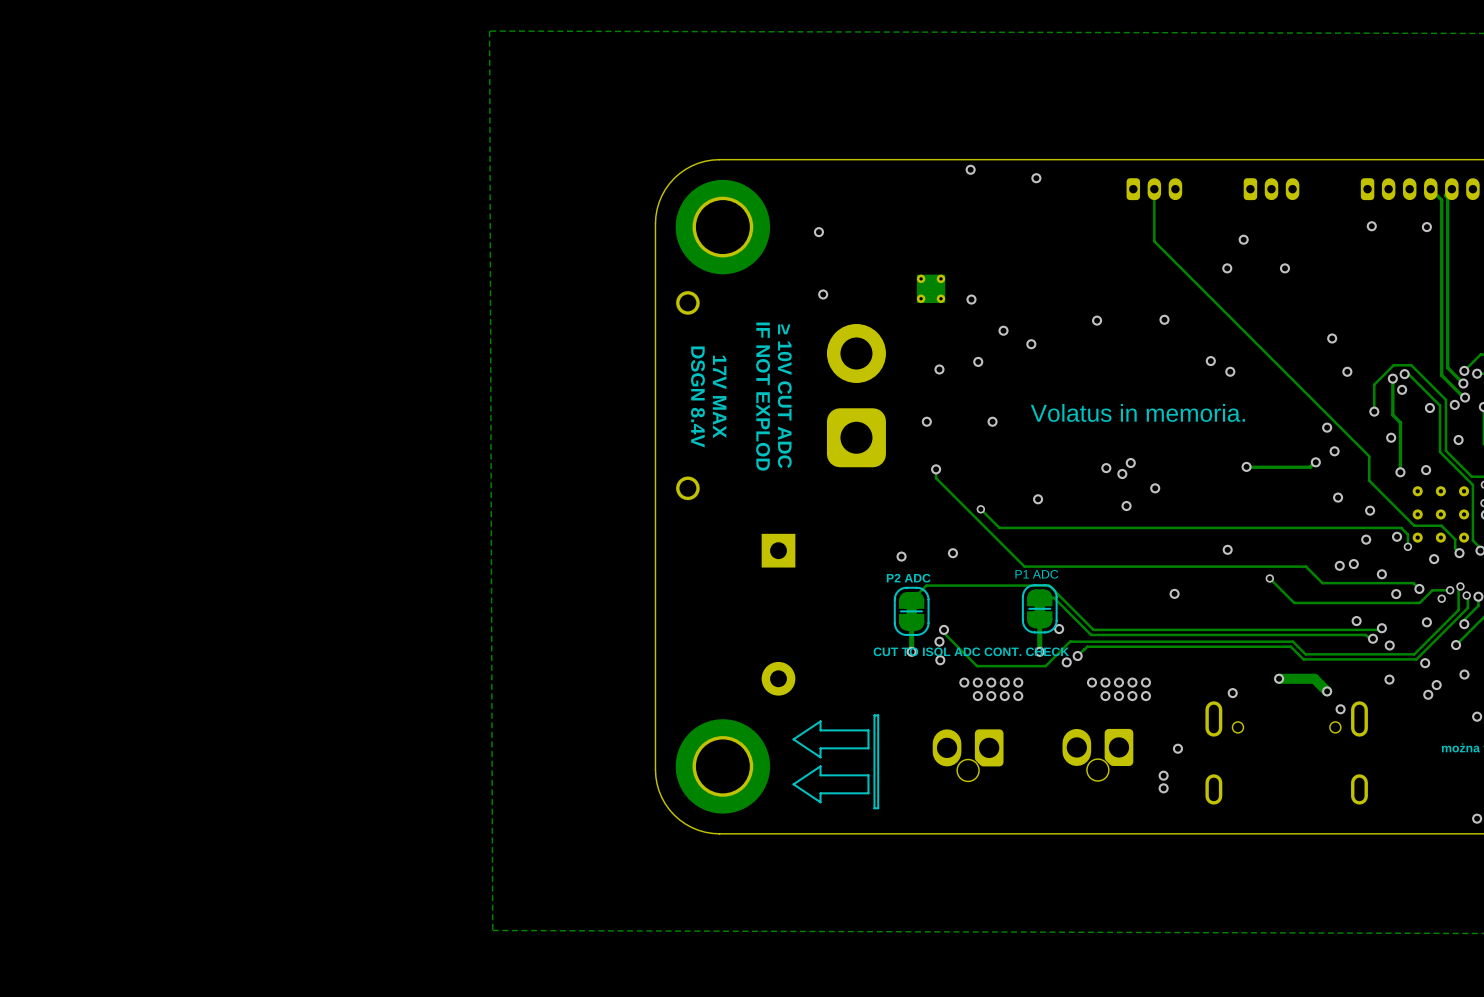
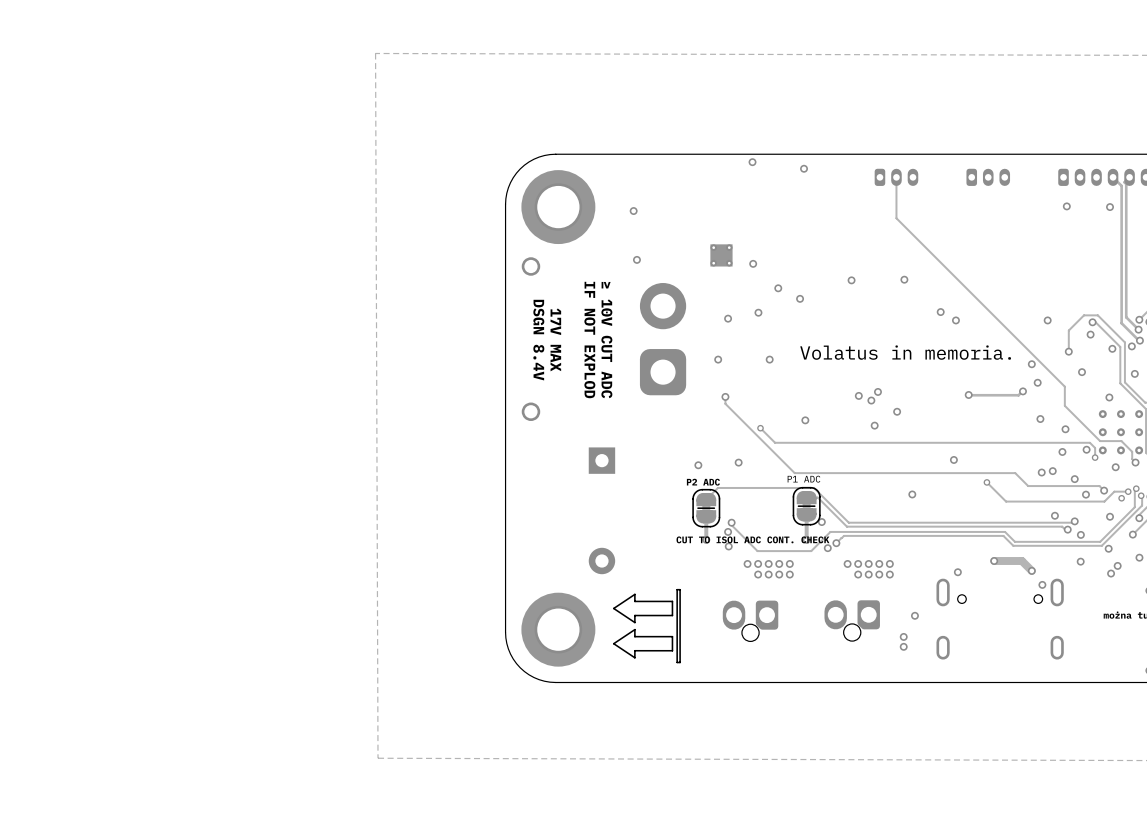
via: (1243, 239) -> none
via: (1227, 268) -> none
via: (1284, 268) -> none
via: (1332, 338) -> none
track: (1392, 378) (1392, 415) (1400, 422) (1400, 472) -> none
via: (1392, 378) -> none
via: (1400, 472) -> none

